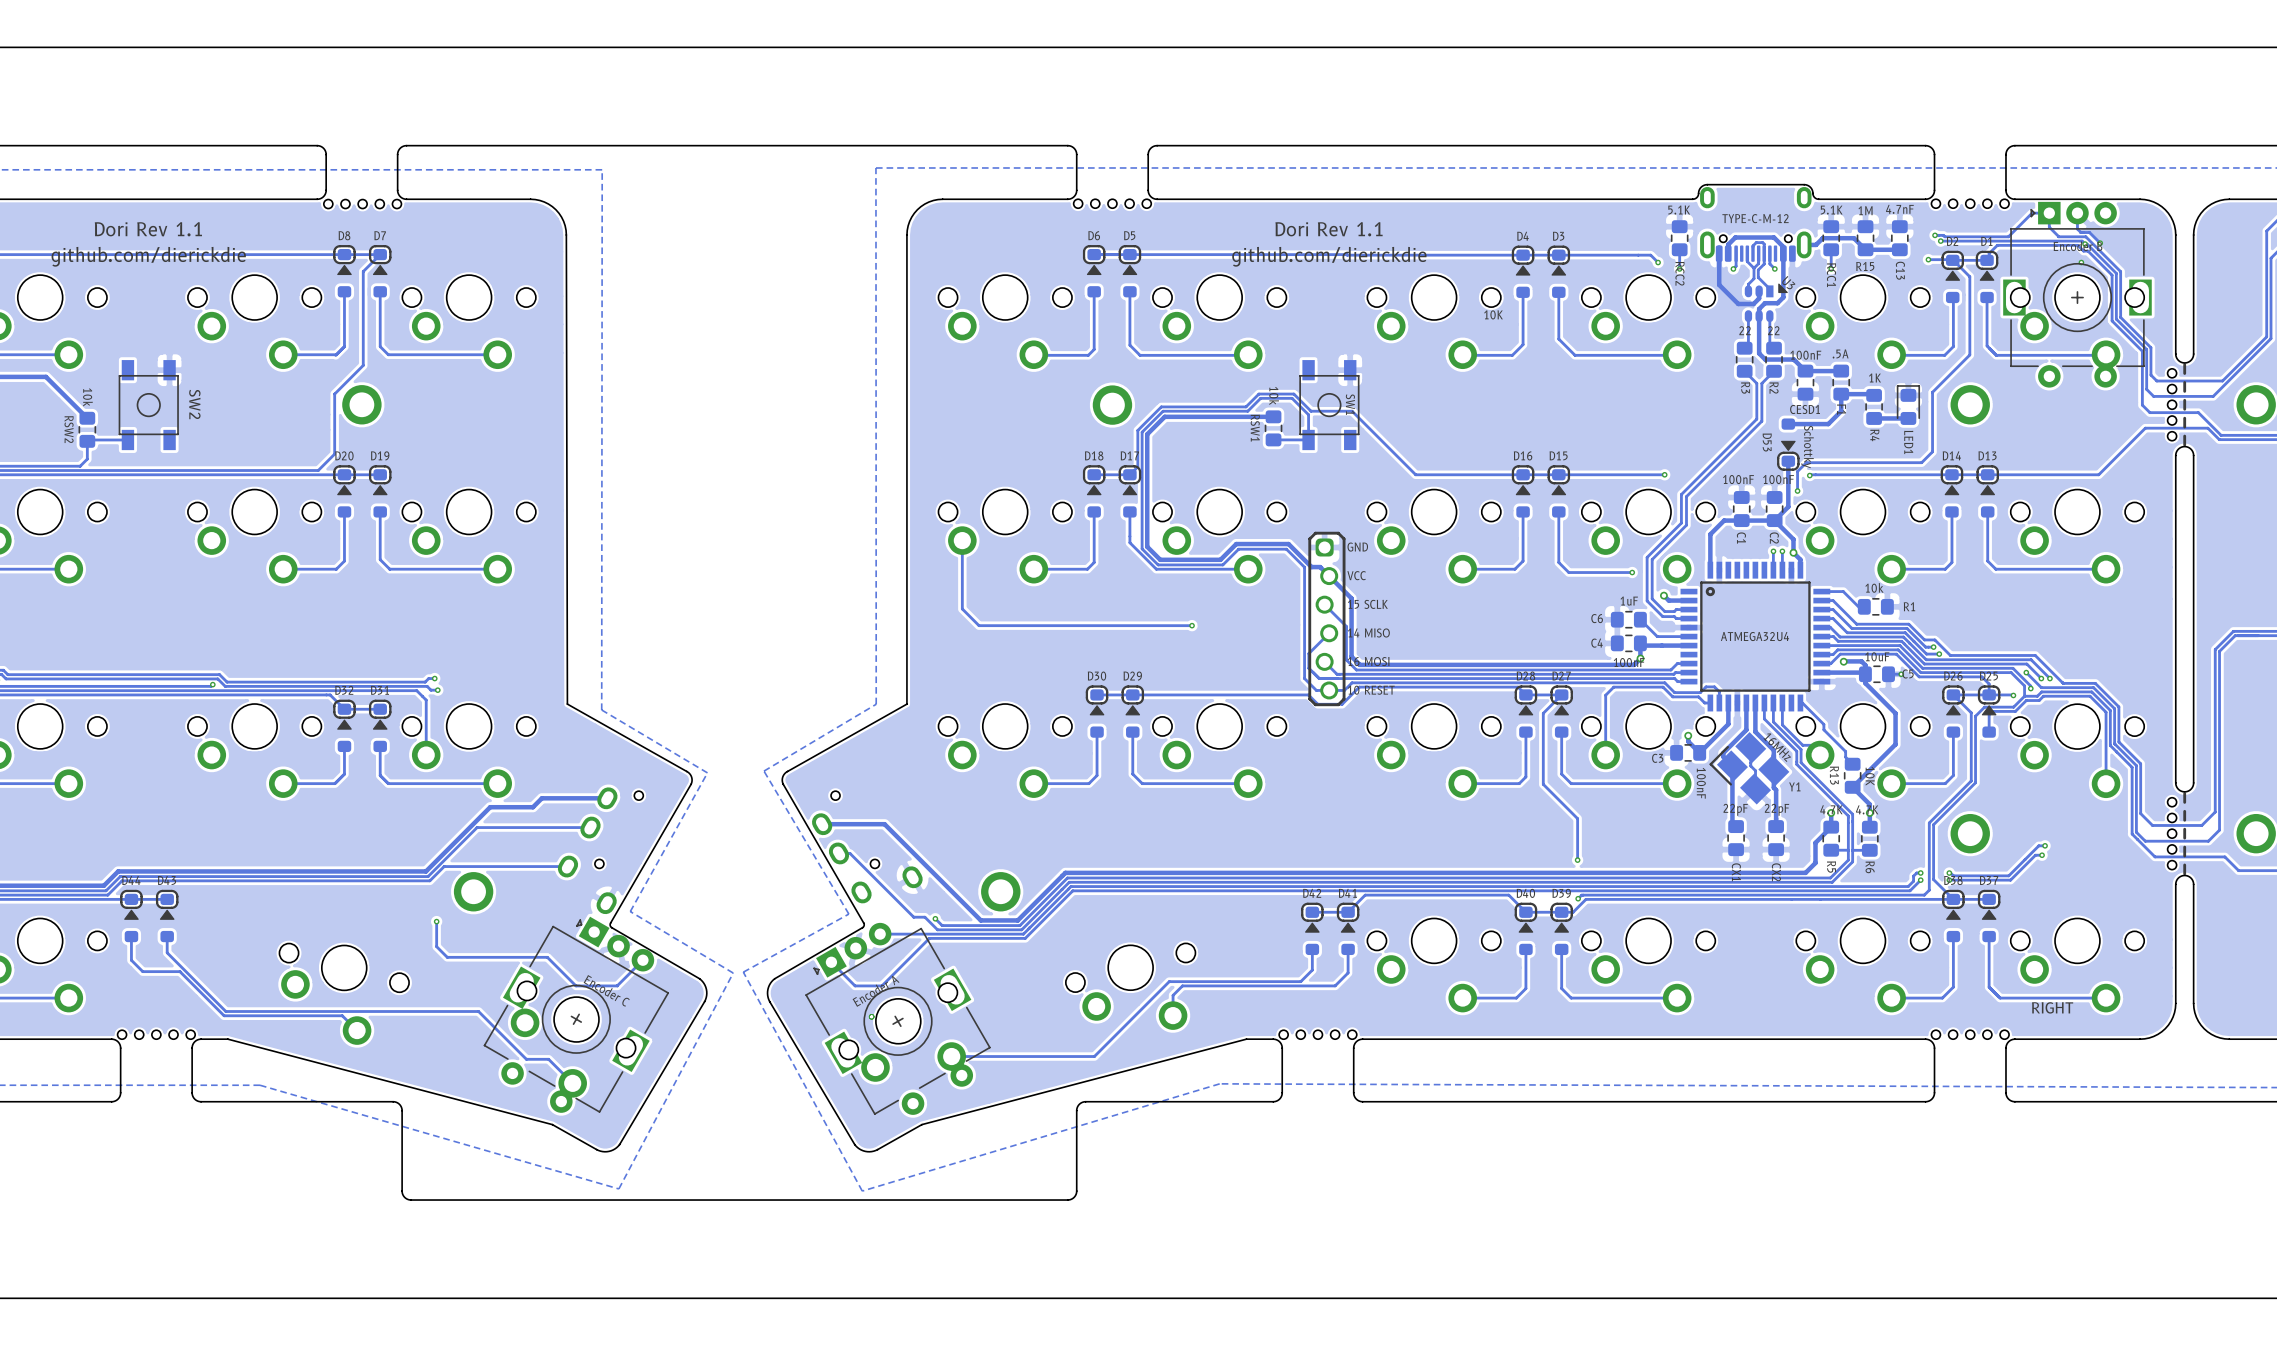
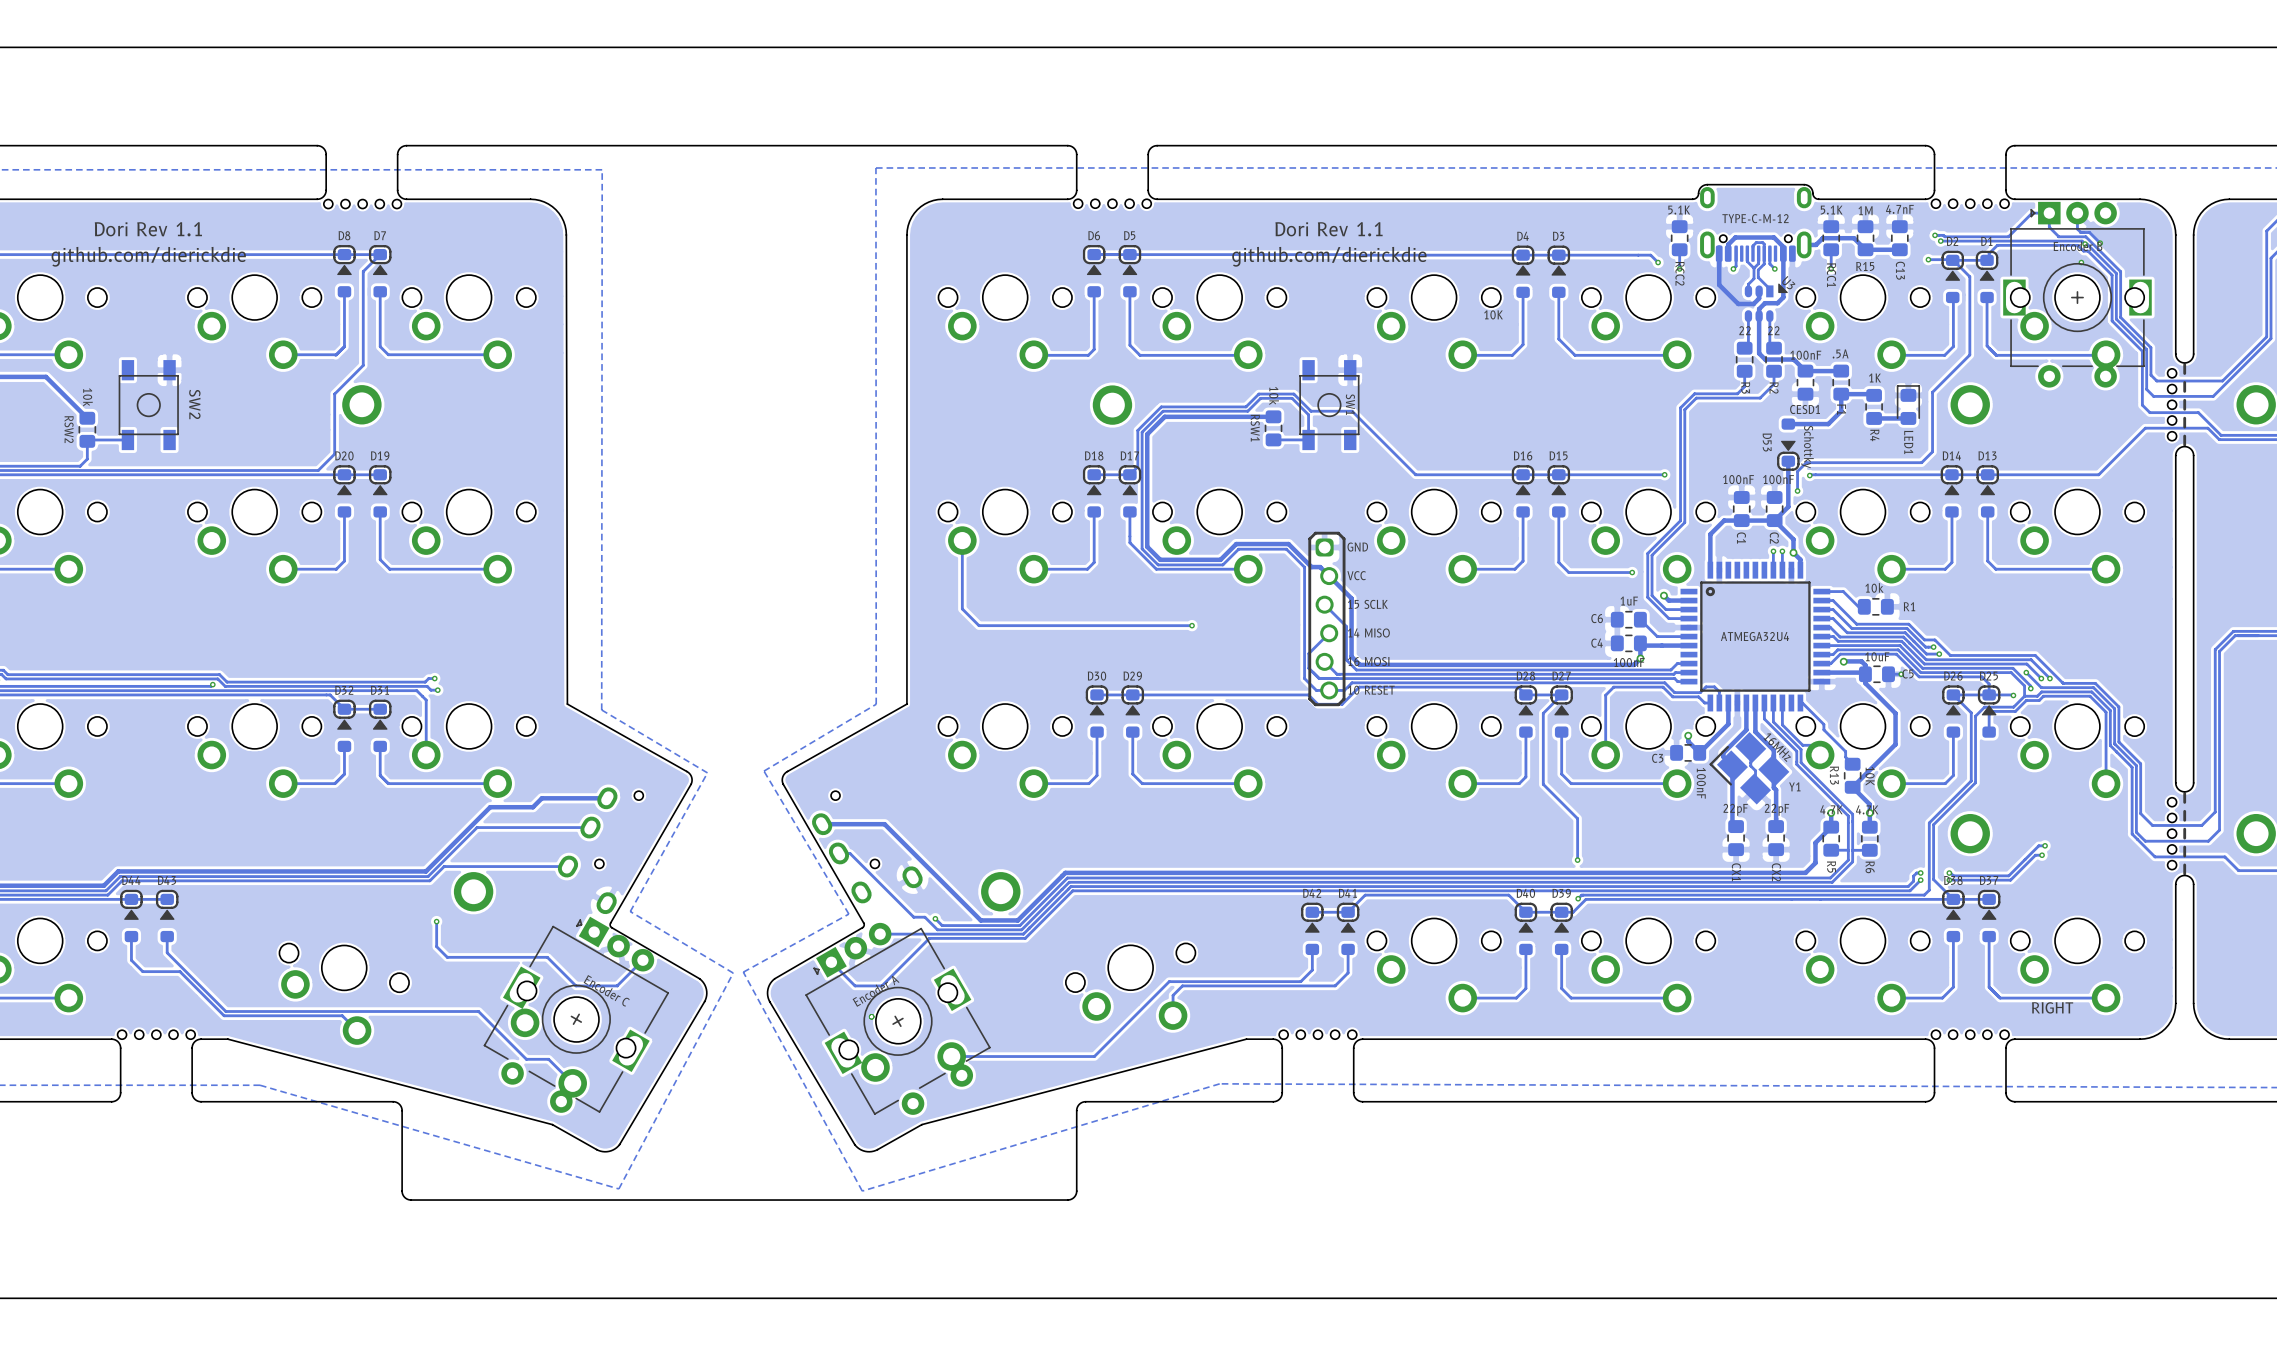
track: (1744, 371) (1756, 383) (1756, 419) (1681, 494) (1681, 523) (1647, 557) (1647, 600) (1662, 616) (1674, 616) (1676, 618) -> (1744, 371) (1744, 386) (1737, 393) (1694, 393) (1680, 407) (1680, 520) (1647, 553) (1647, 597) (1668, 618) (1676, 618)
track: (1774, 371) (1761, 383) (1761, 421) (1686, 496) (1686, 525) (1652, 559) (1652, 598) (1664, 611) (1674, 611) (1676, 609) -> (1774, 371) (1774, 384) (1760, 398) (1696, 398) (1684, 409) (1684, 522) (1652, 555) (1652, 595) (1665, 609) (1676, 609)

